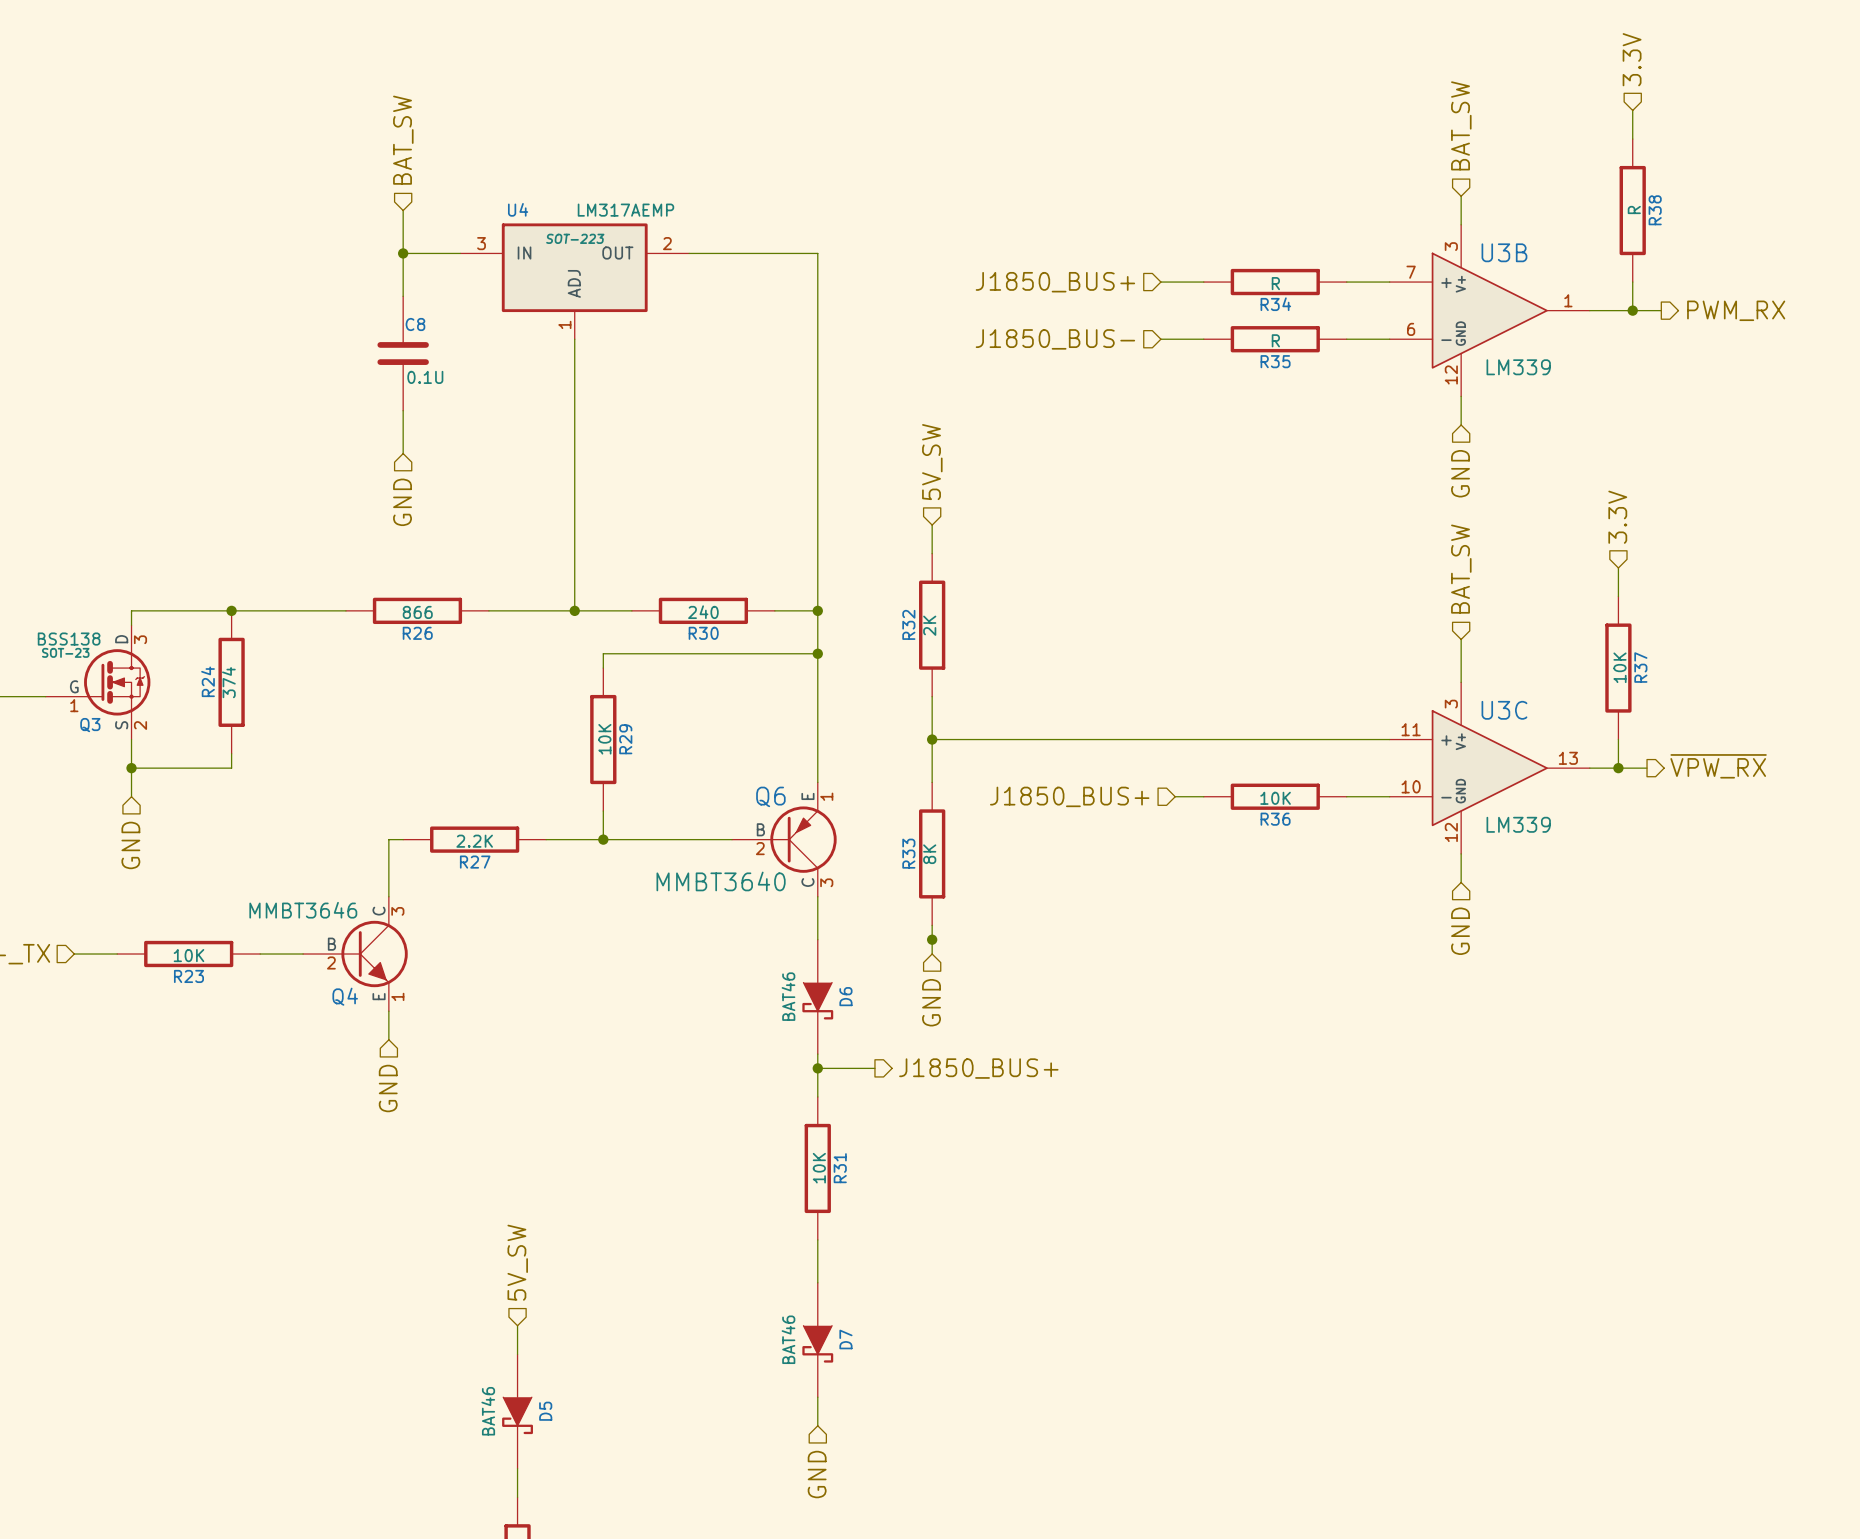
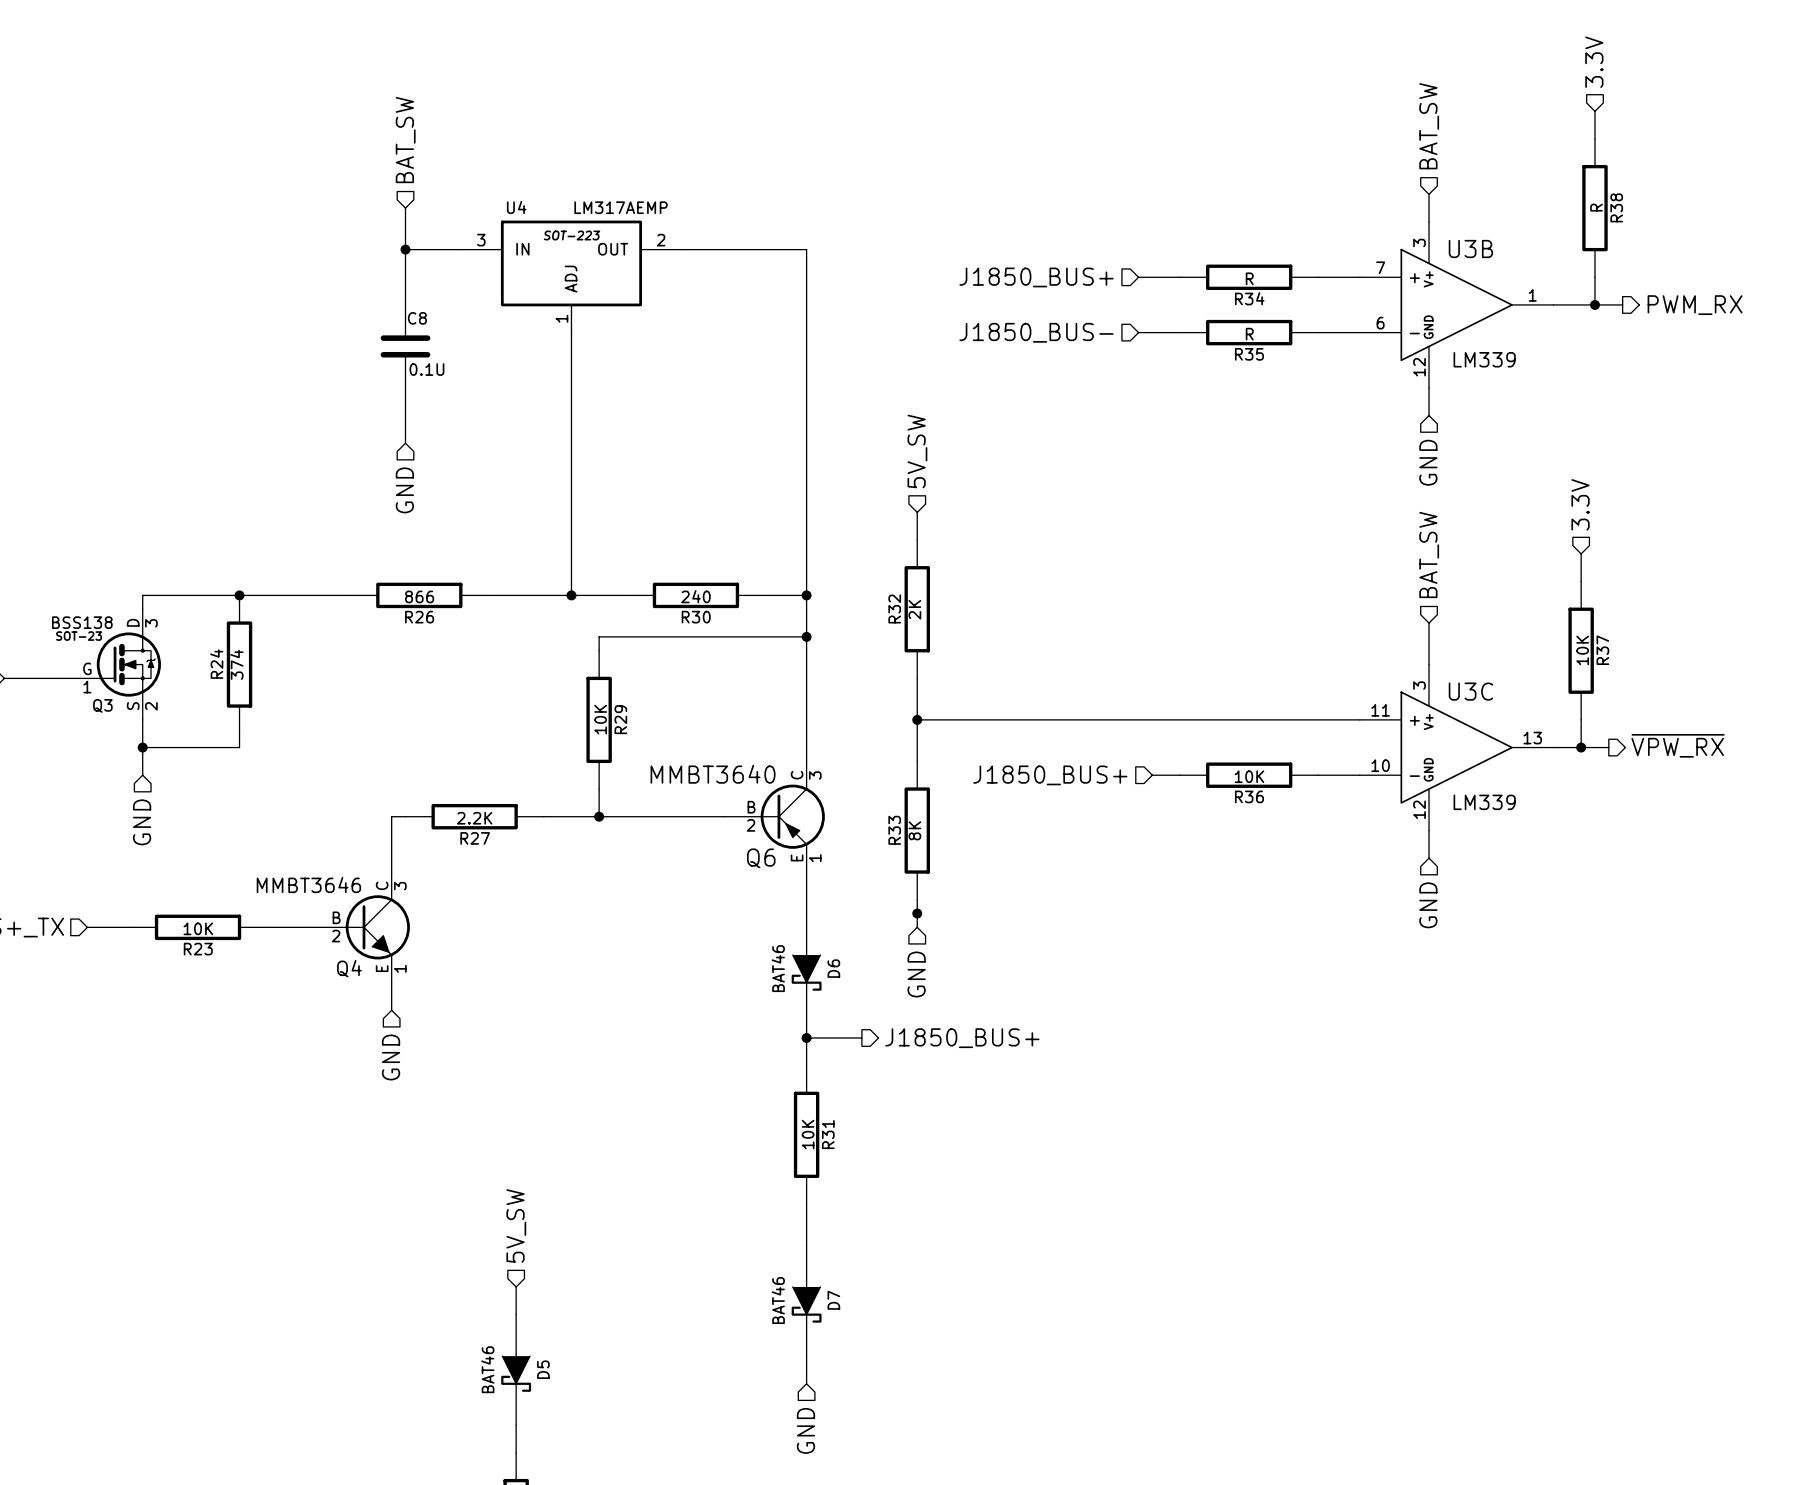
Q6 flip: as is (803, 839) -> up-down (792, 816)

